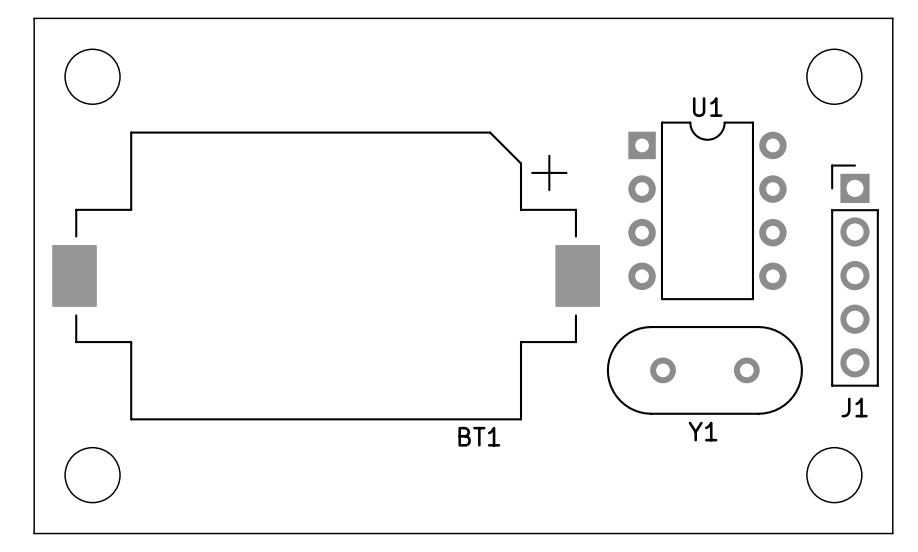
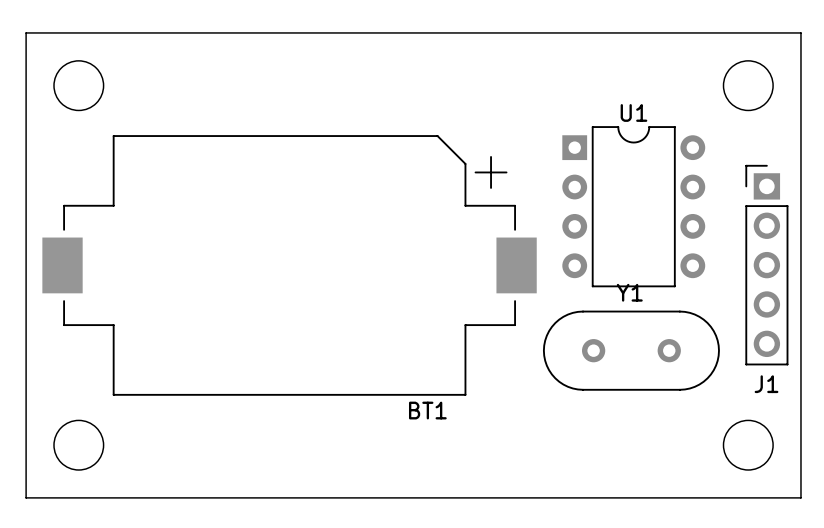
Y1 name position: Y1 (703, 431) -> Y1 (629, 292)

